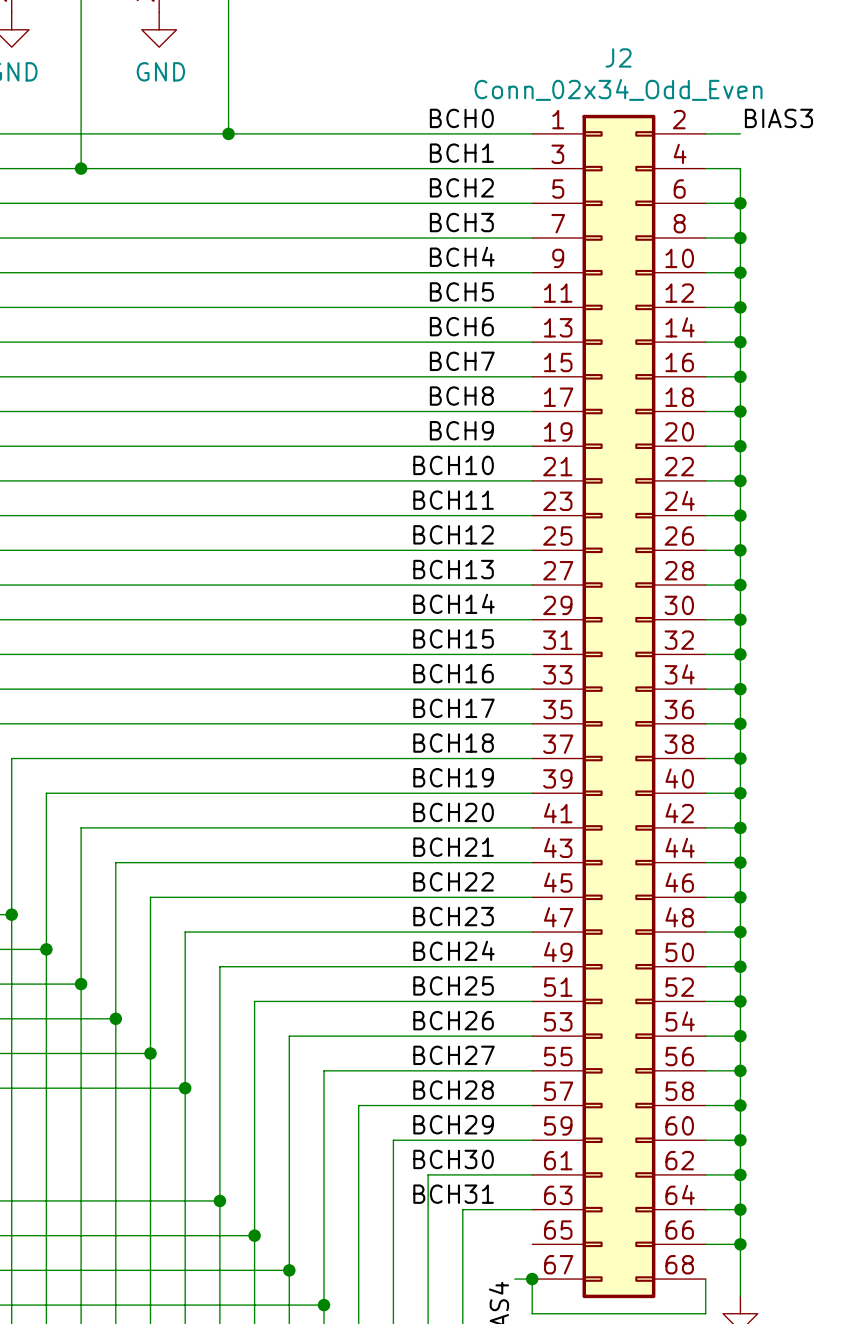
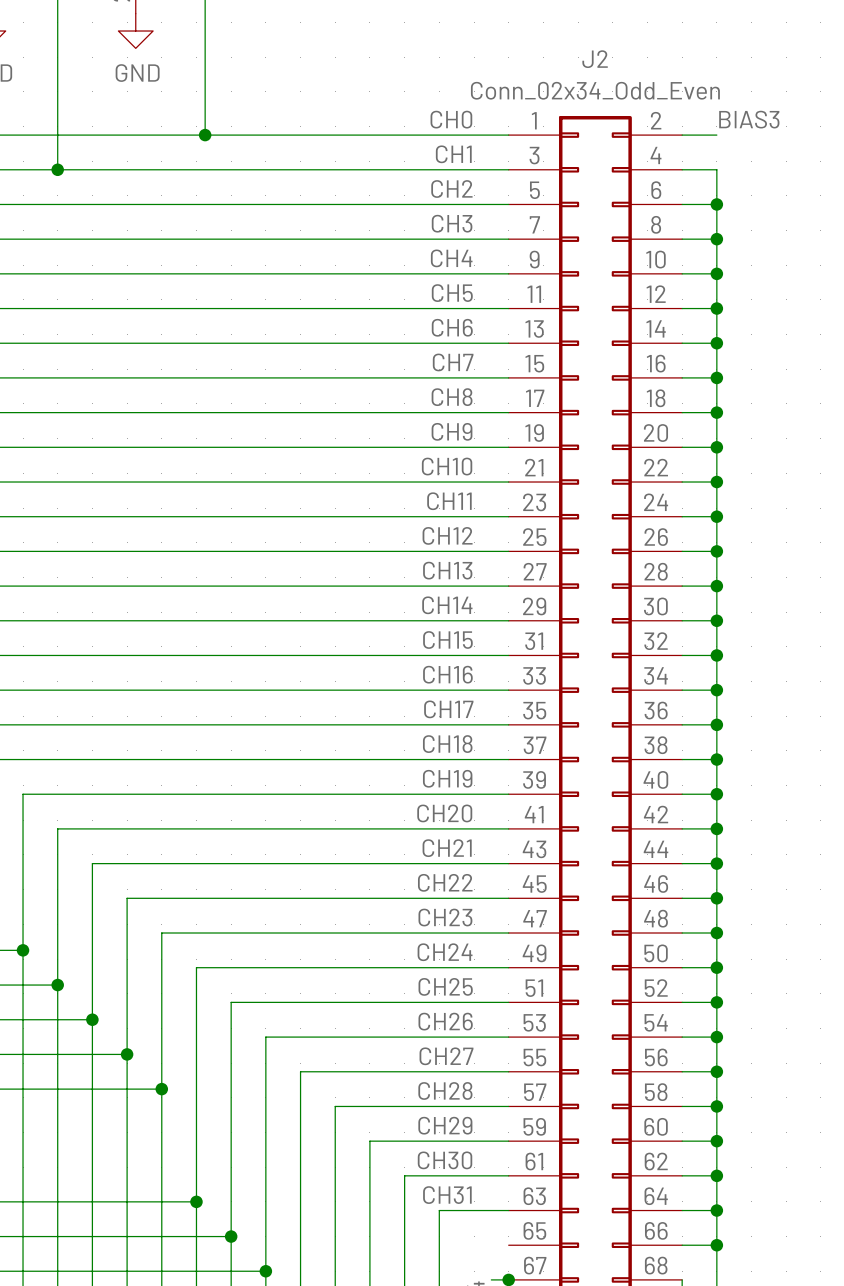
label: BCH0 (461, 118) -> CH0 (451, 119)
label: BCH1 (461, 153) -> CH1 (453, 154)
label: BCH2 (461, 187) -> CH2 (451, 189)
label: BCH3 (461, 222) -> CH3 (452, 223)
label: BCH4 (462, 256) -> CH4 (451, 258)
label: BCH5 (461, 291) -> CH5 (452, 293)
label: BCH6 (461, 326) -> CH6 (452, 327)
label: BCH7 (462, 361) -> CH7 (453, 362)
label: BCH8 (461, 396) -> CH8 (452, 397)
label: BCH9 (461, 430) -> CH9 (452, 431)
label: BCH10 (453, 465) -> CH10 (447, 466)
label: BCH11 (453, 500) -> CH11 (449, 501)
label: BCH12 (453, 534) -> CH12 (447, 535)
label: BCH13 (453, 569) -> CH13 (447, 570)
label: BCH14 (453, 603) -> CH14 (447, 605)
label: BCH15 (453, 638) -> CH15 (447, 640)
label: BCH16 (453, 673) -> CH16 (447, 674)
label: BCH17 (453, 708) -> CH17 (448, 709)
label: BCH18 (453, 743) -> CH18 (447, 744)
label: BCH19 (453, 777) -> CH19 (447, 778)
label: BCH20 (453, 812) -> CH20 (444, 813)
label: BCH21 (453, 847) -> CH21 (447, 848)
label: BCH22 (453, 881) -> CH22 (445, 882)
label: BCH23 (453, 916) -> CH23 (445, 917)
label: BCH24 (453, 950) -> CH24 (445, 952)
label: BCH25 (453, 985) -> CH25 (445, 986)
label: BCH26 (453, 1020) -> CH26 (445, 1021)
label: BCH27 (453, 1055) -> CH27 (446, 1056)
label: BCH28 (453, 1090) -> CH28 (445, 1090)
label: BCH29 (453, 1124) -> CH29 (445, 1125)
label: BCH30 (453, 1159) -> CH30 (445, 1160)
label: BCH31 (453, 1194) -> CH31 (447, 1195)

